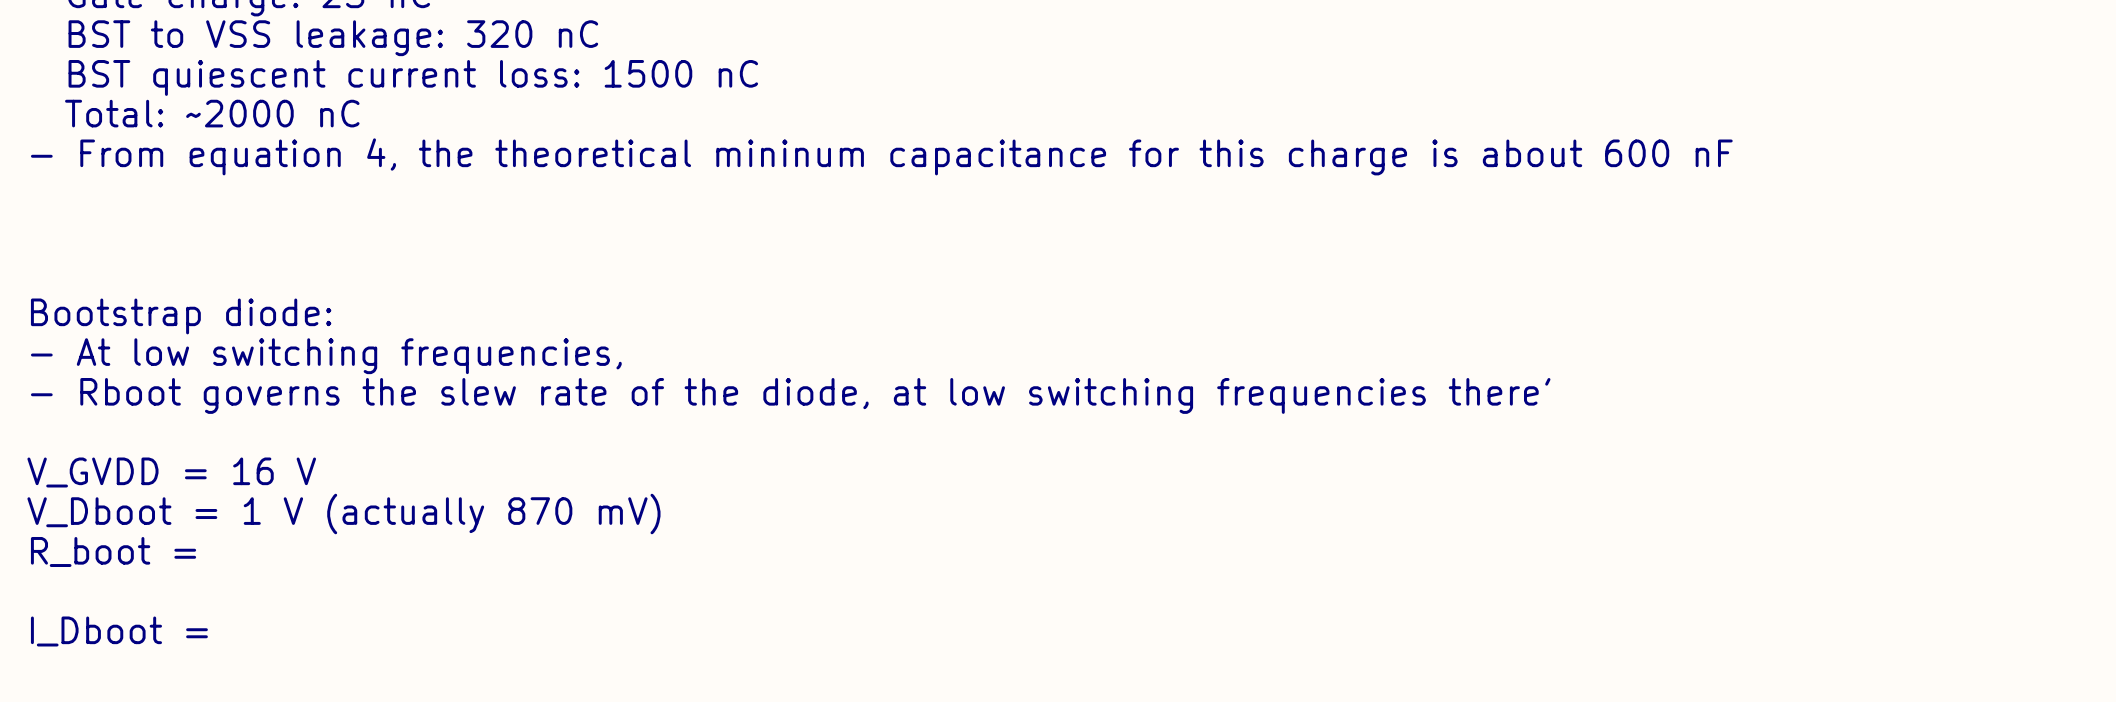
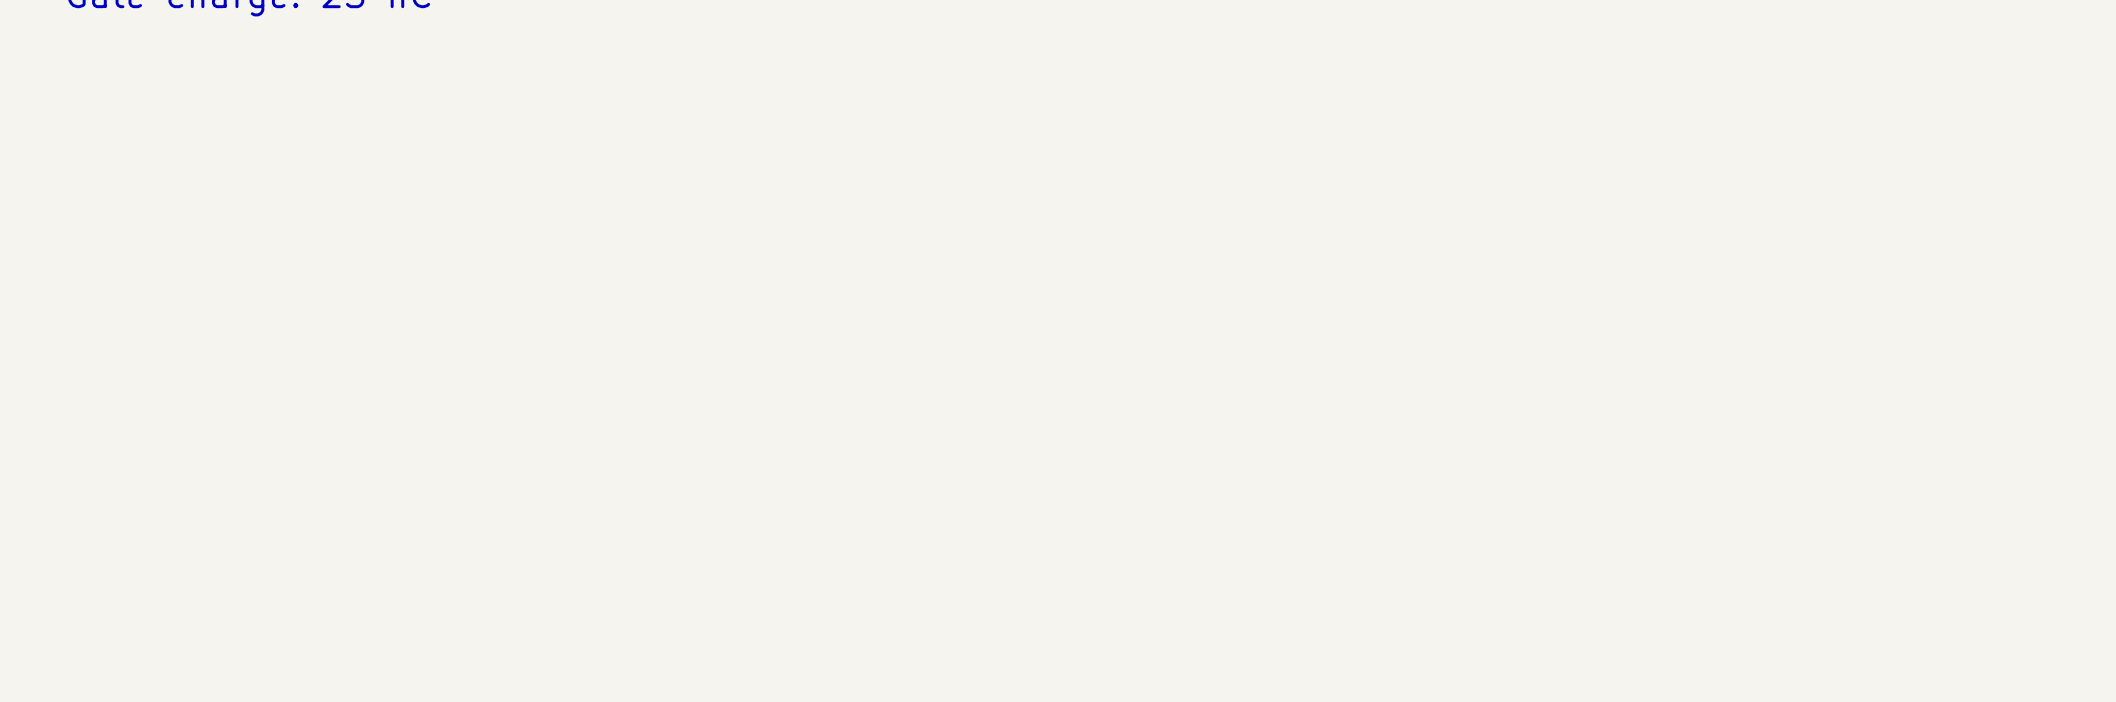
text: BST to VSS leakage: 320 nC (333, 38) -> none
text: BST quiescent current loss: 1500 nC (413, 77) -> none
text: Total: ~2000 nC (212, 113) -> none
text: - From equation 4, the theoretical mininum capacitance for this charge is about 600 nF (881, 156) -> none
text: Bootstrap diode: (181, 316) -> none
text: - At low switching frequencies, (326, 356) -> none
text: - Rboot governs the slew rate of the diode, at low switching frequencies there' (790, 395) -> none
text: V_GVDD = 16 V (171, 472) -> none
text: V_Dboot = 1 V (actually 870 mV) (343, 514) -> none
text: R_boot = (113, 551) -> none
text: I_Dboot = (119, 631) -> none

